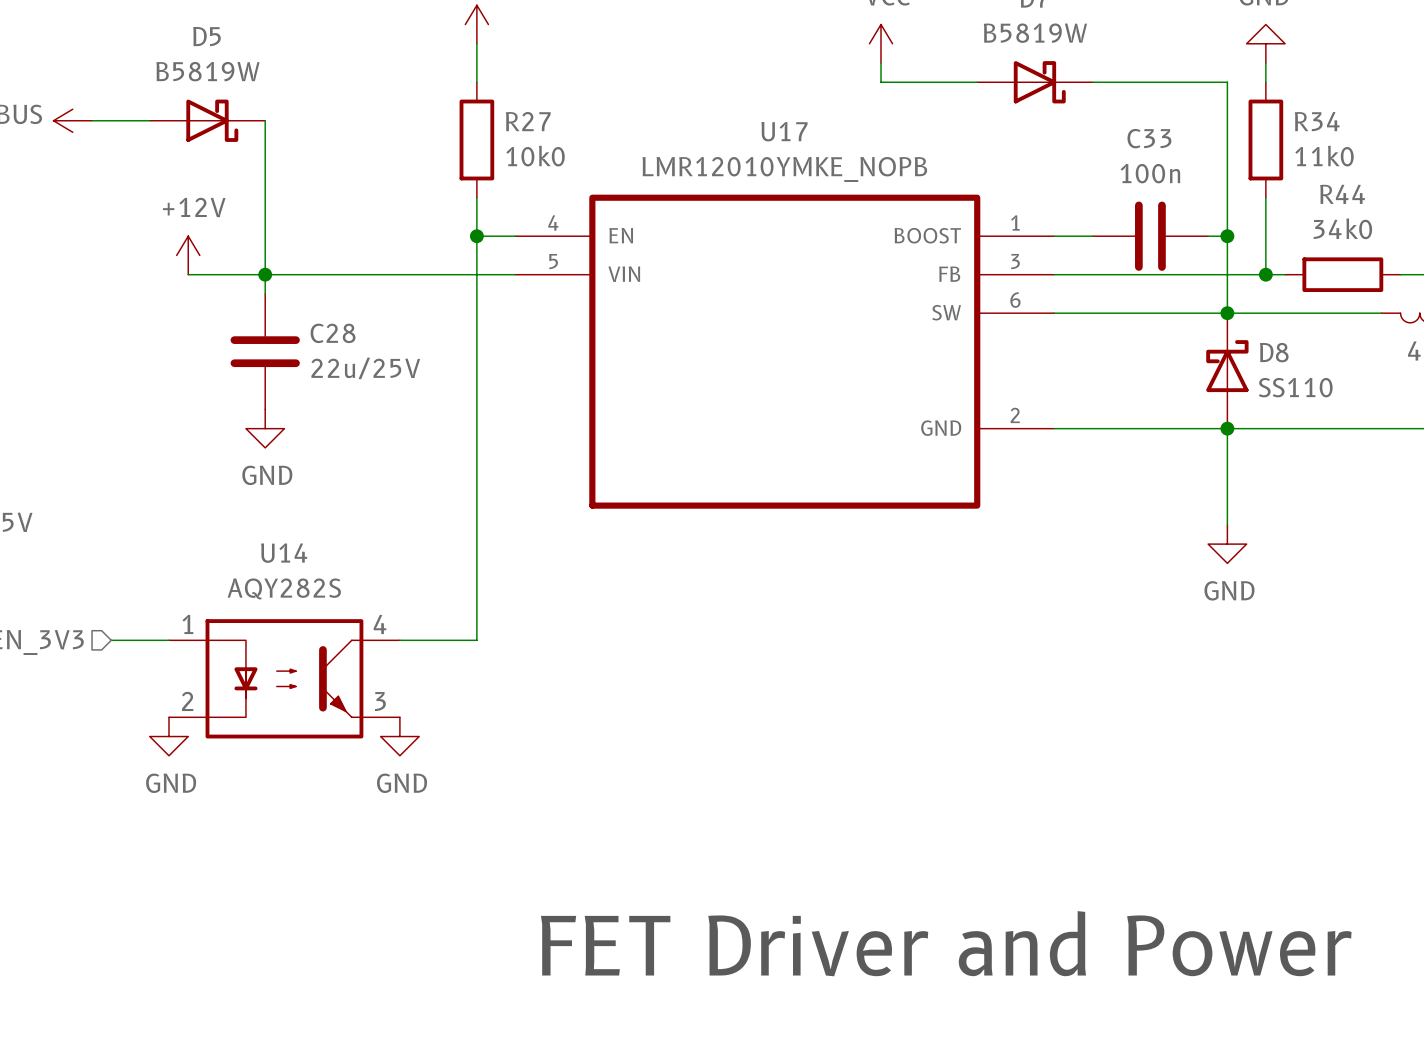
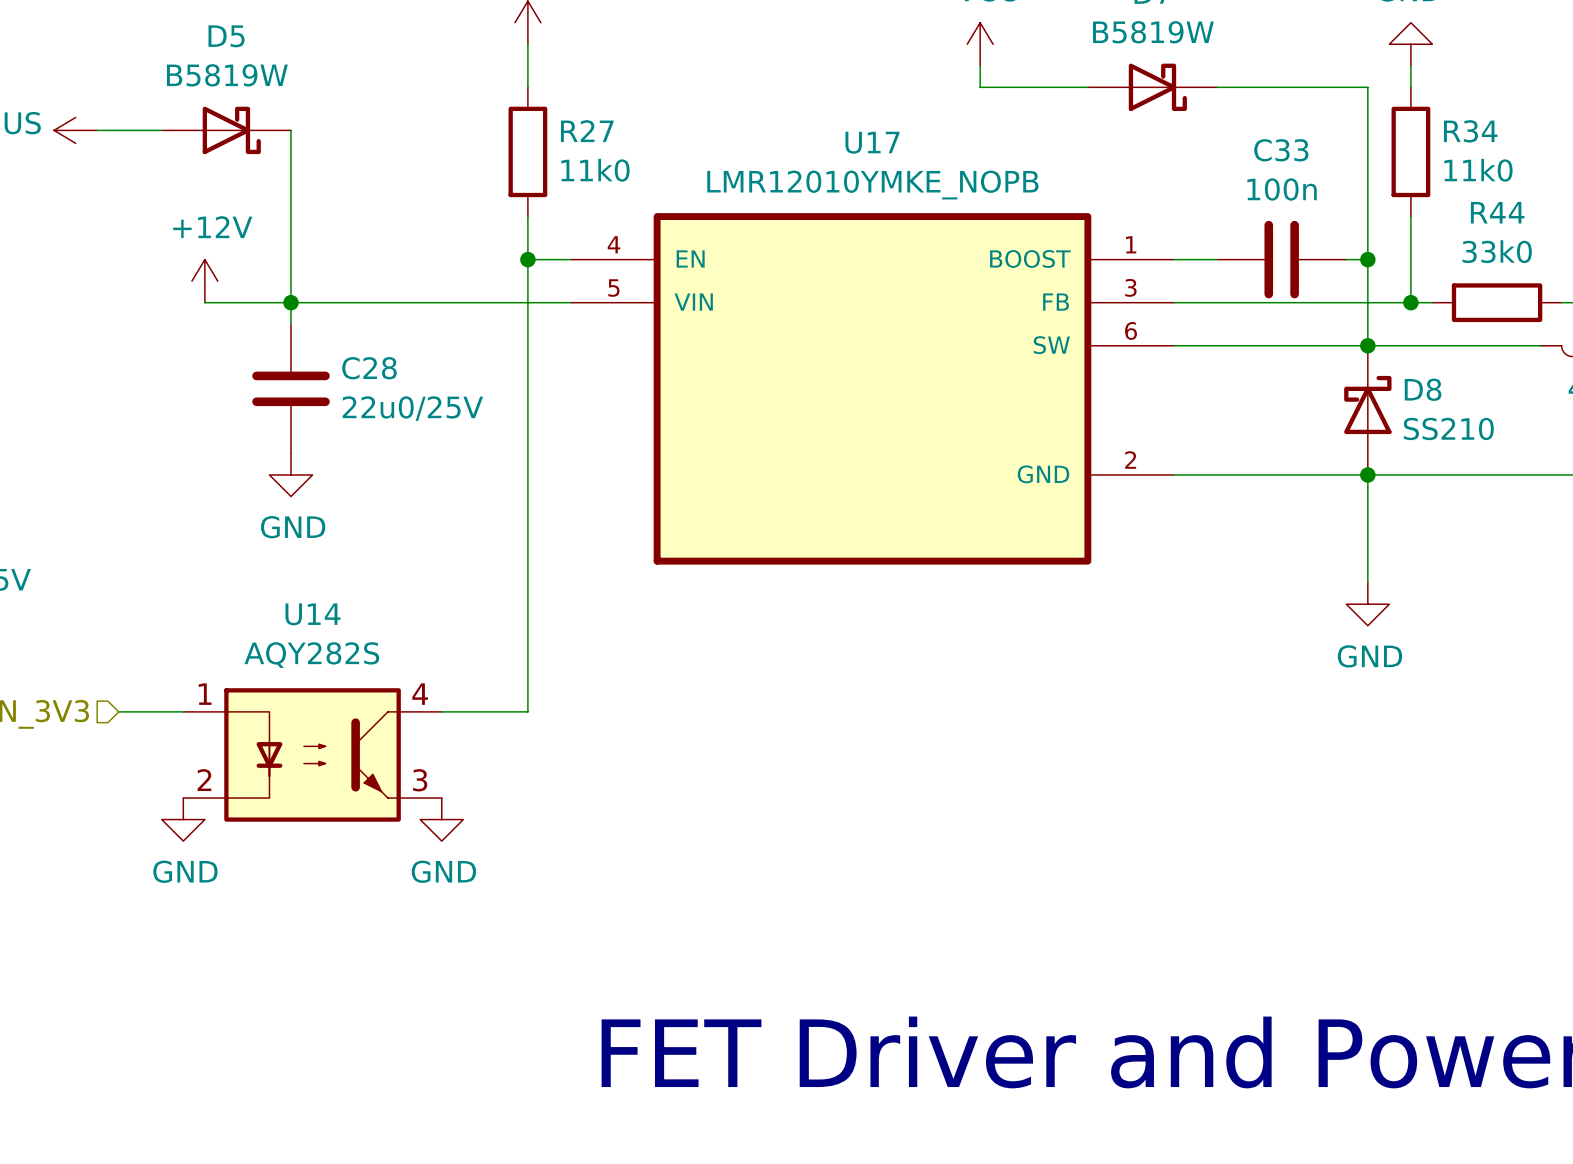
R27 value: 10k0 (535, 156) -> 11k0 (595, 170)
R44 value: 34k0 (1342, 228) -> 33k0 (1497, 251)
C28 value: 22u/25V (365, 368) -> 22u0/25V (412, 408)
D8 value: SS110 (1295, 387) -> SS210 (1448, 428)

